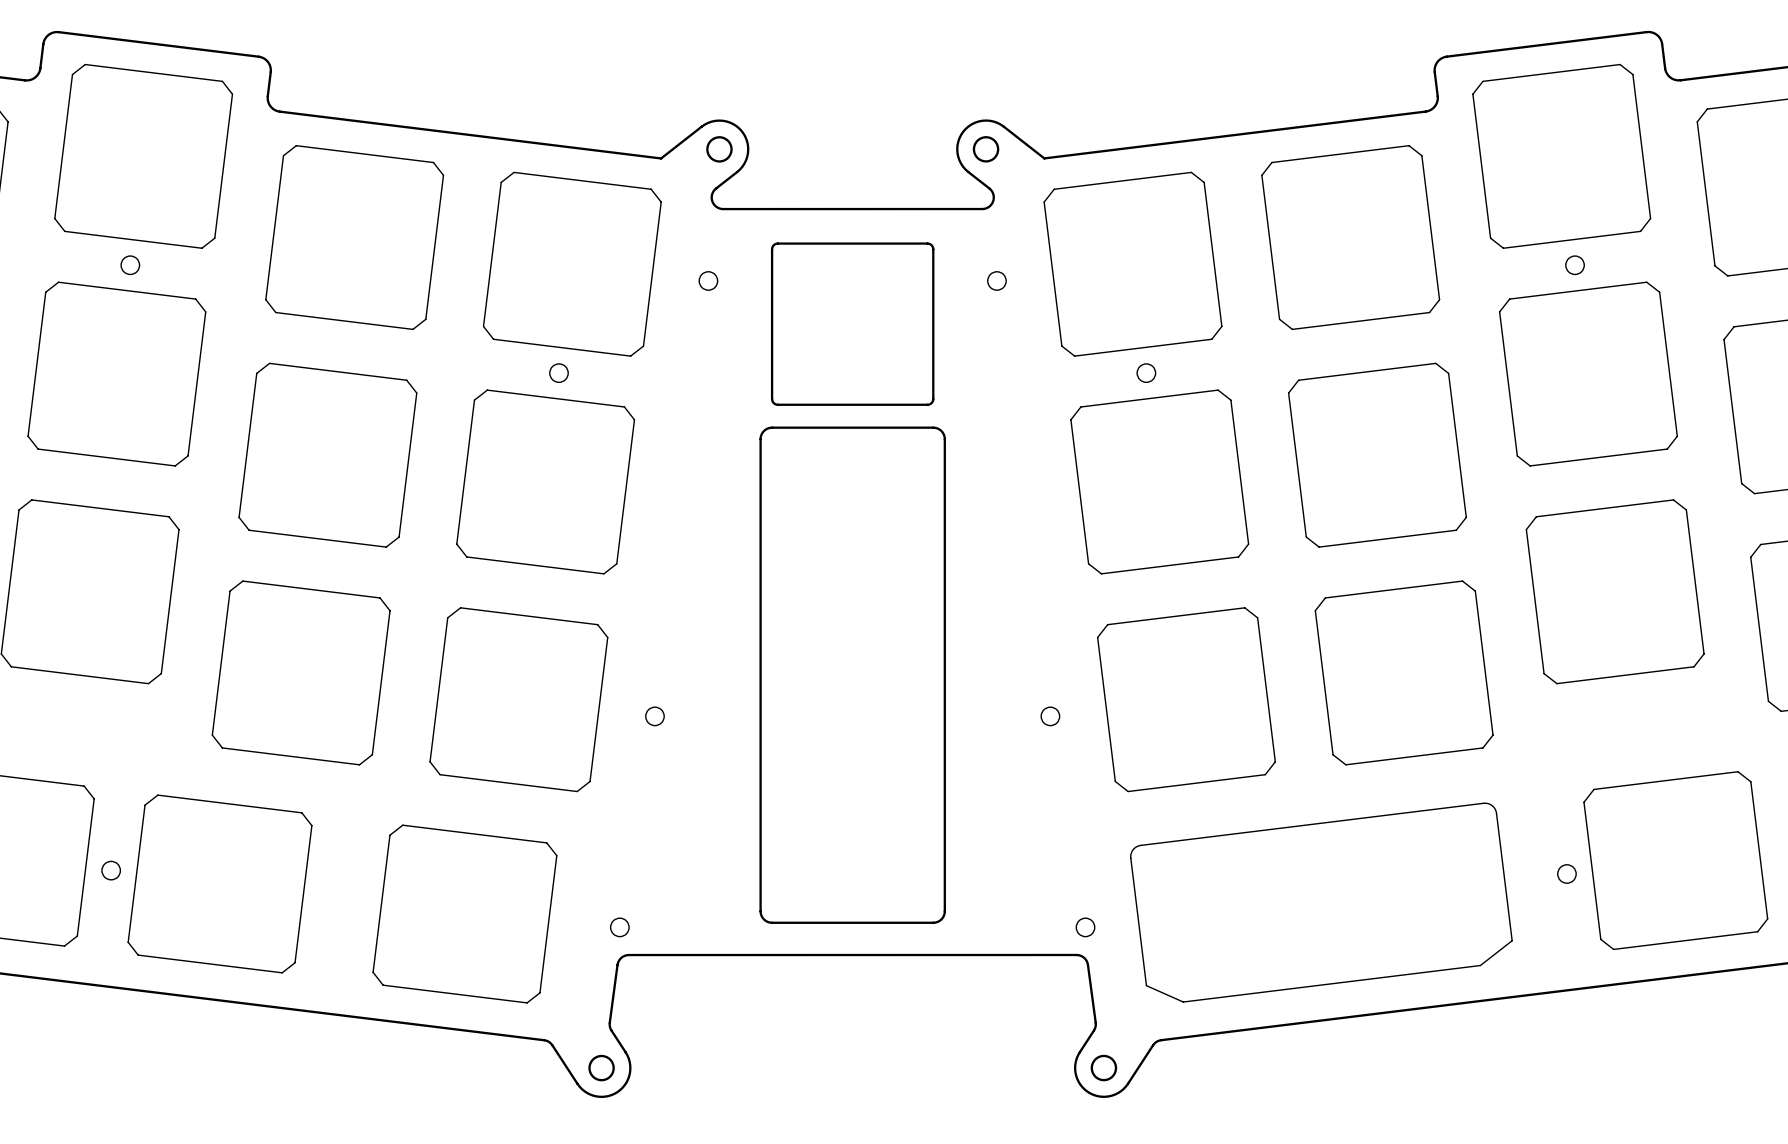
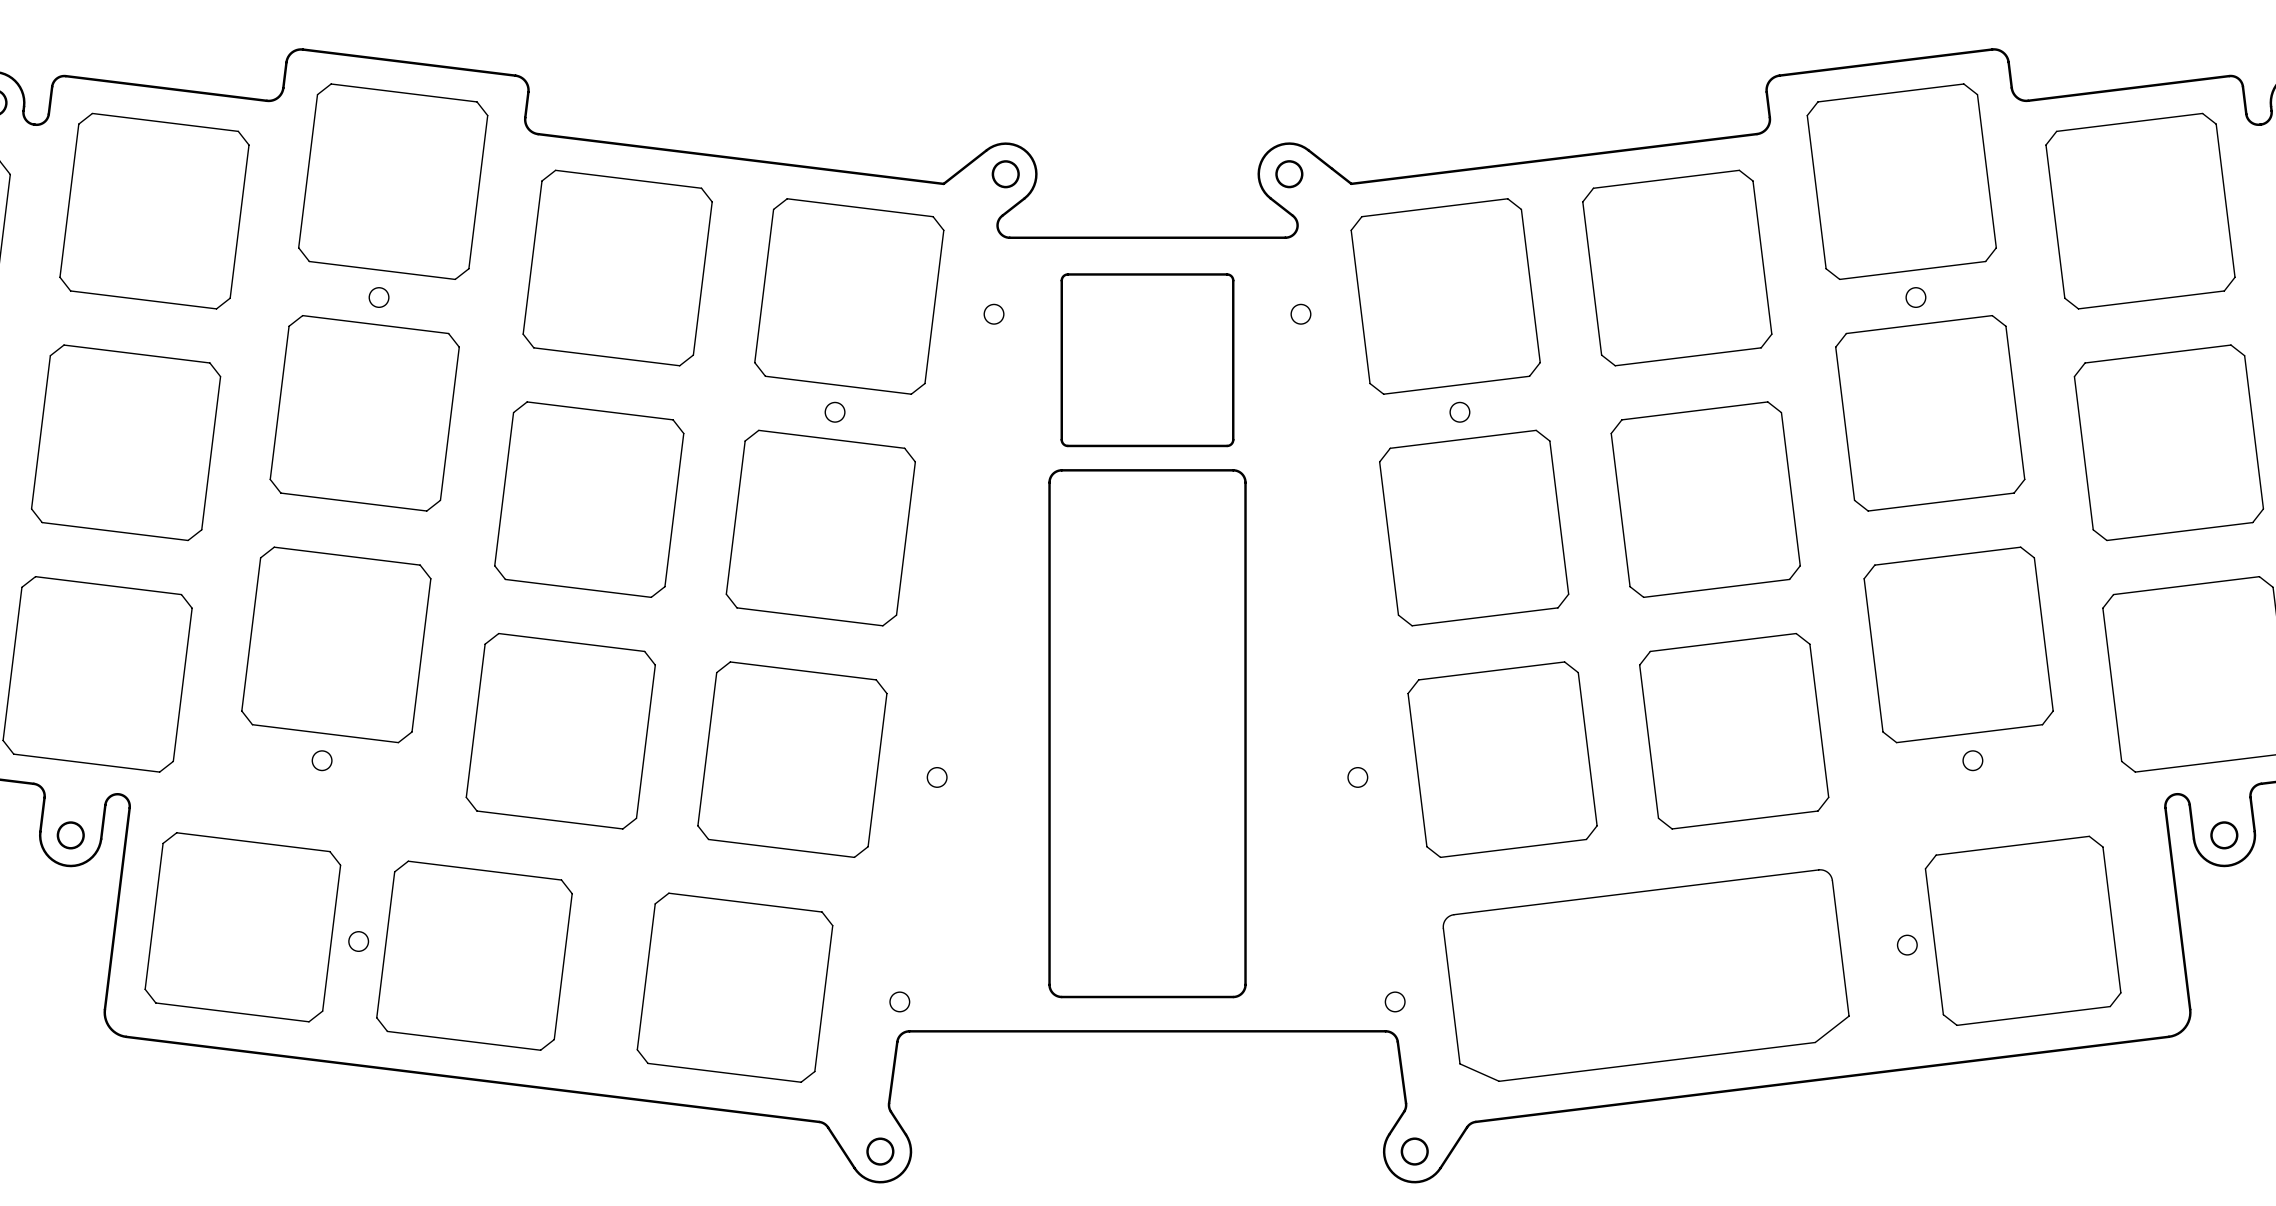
drawing: none -> [312, 750, 333, 771]
drawing: none -> [1962, 750, 1984, 771]

